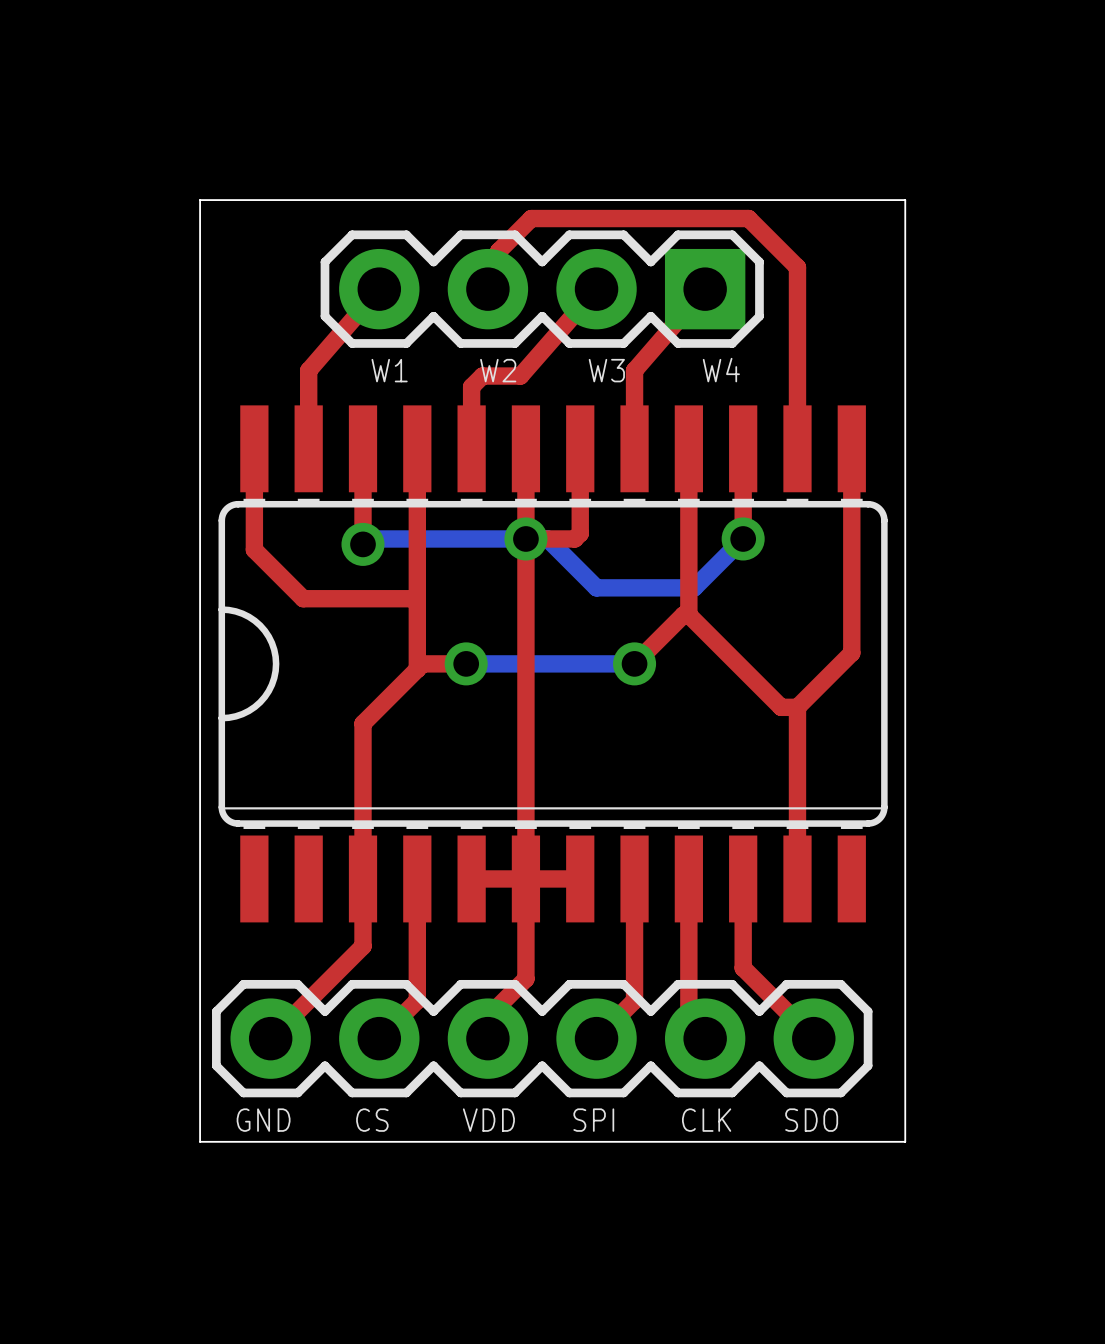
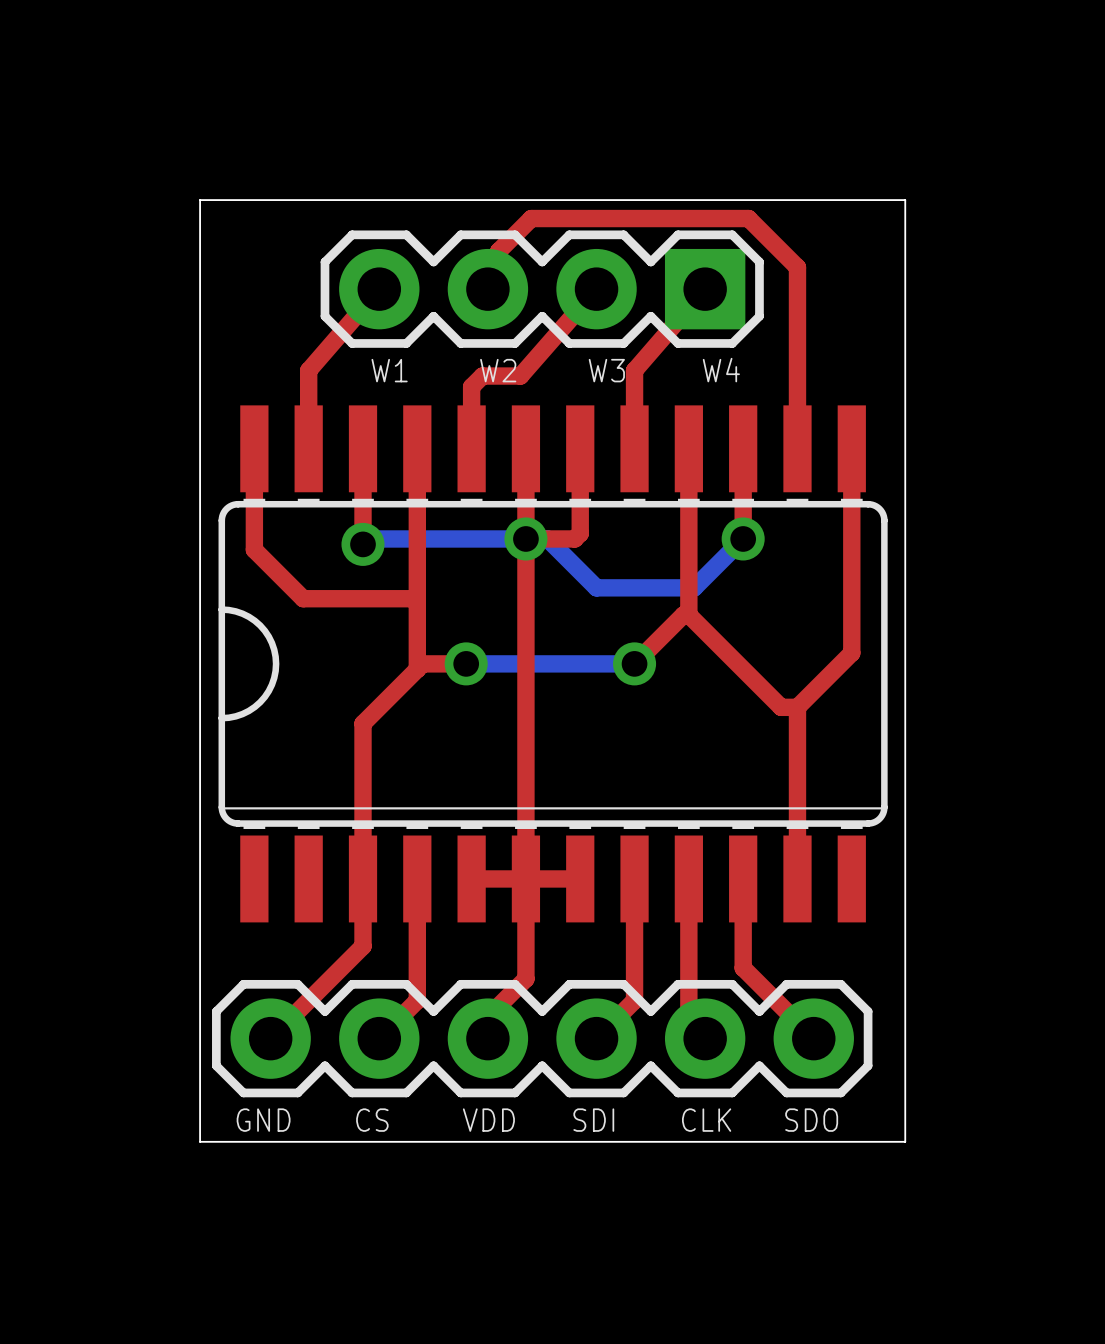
text: SPI (593, 1120) -> SDI (593, 1120)

